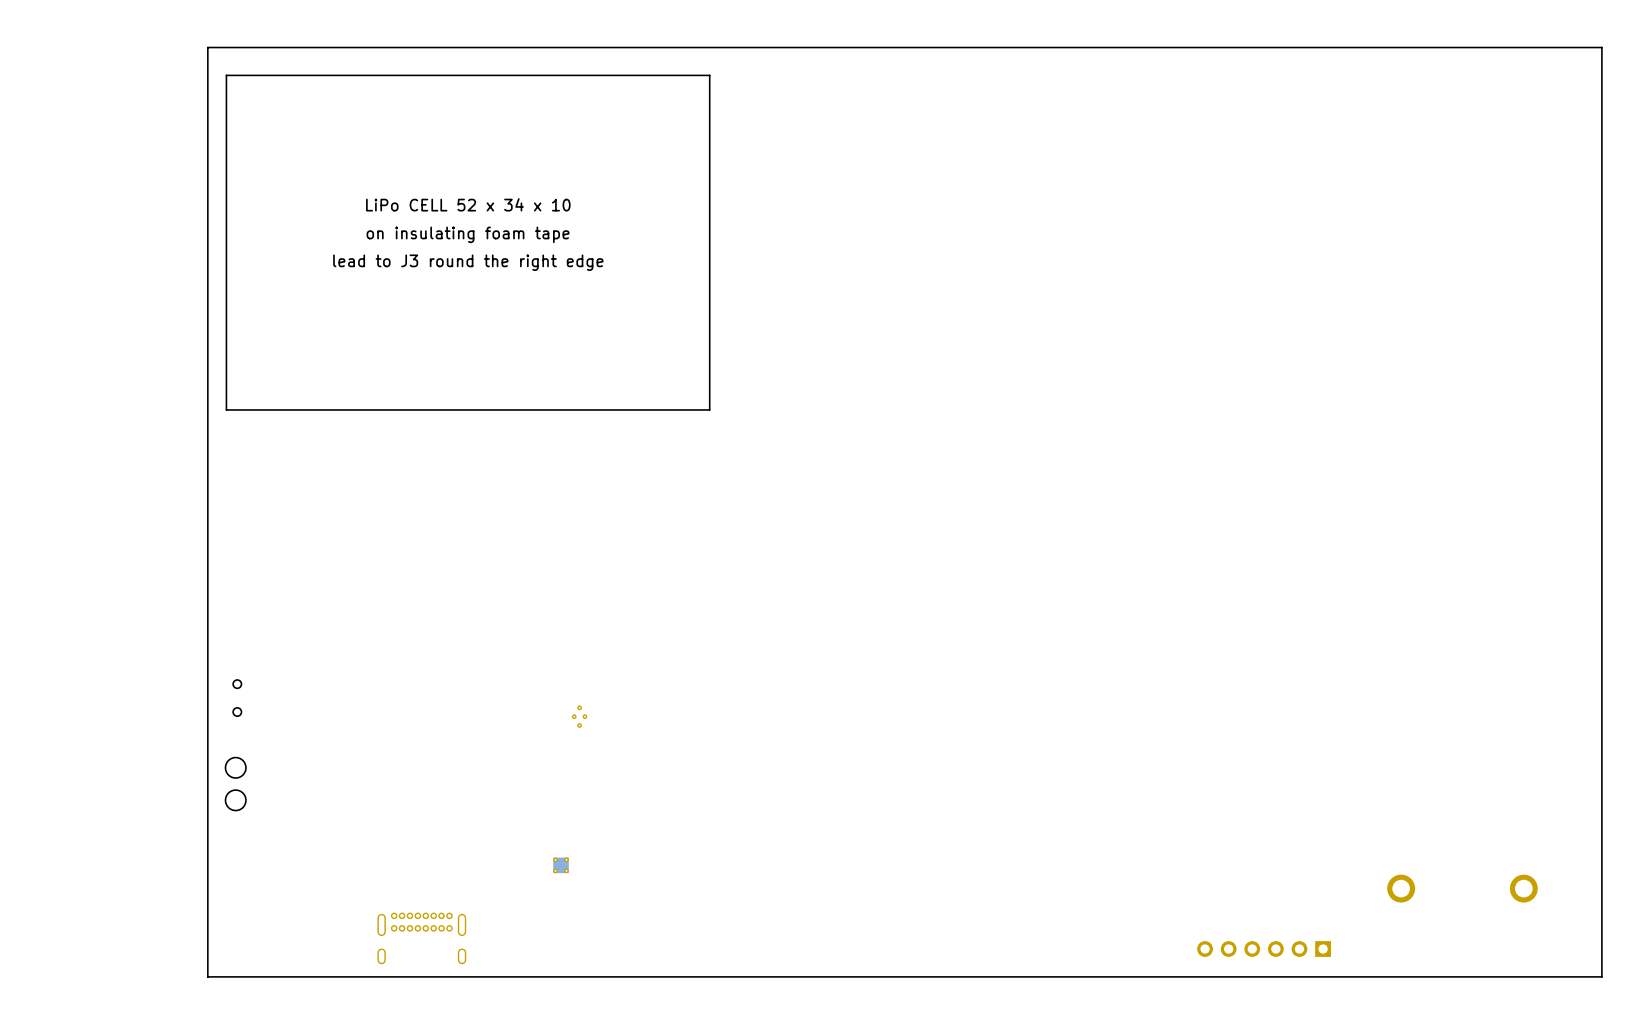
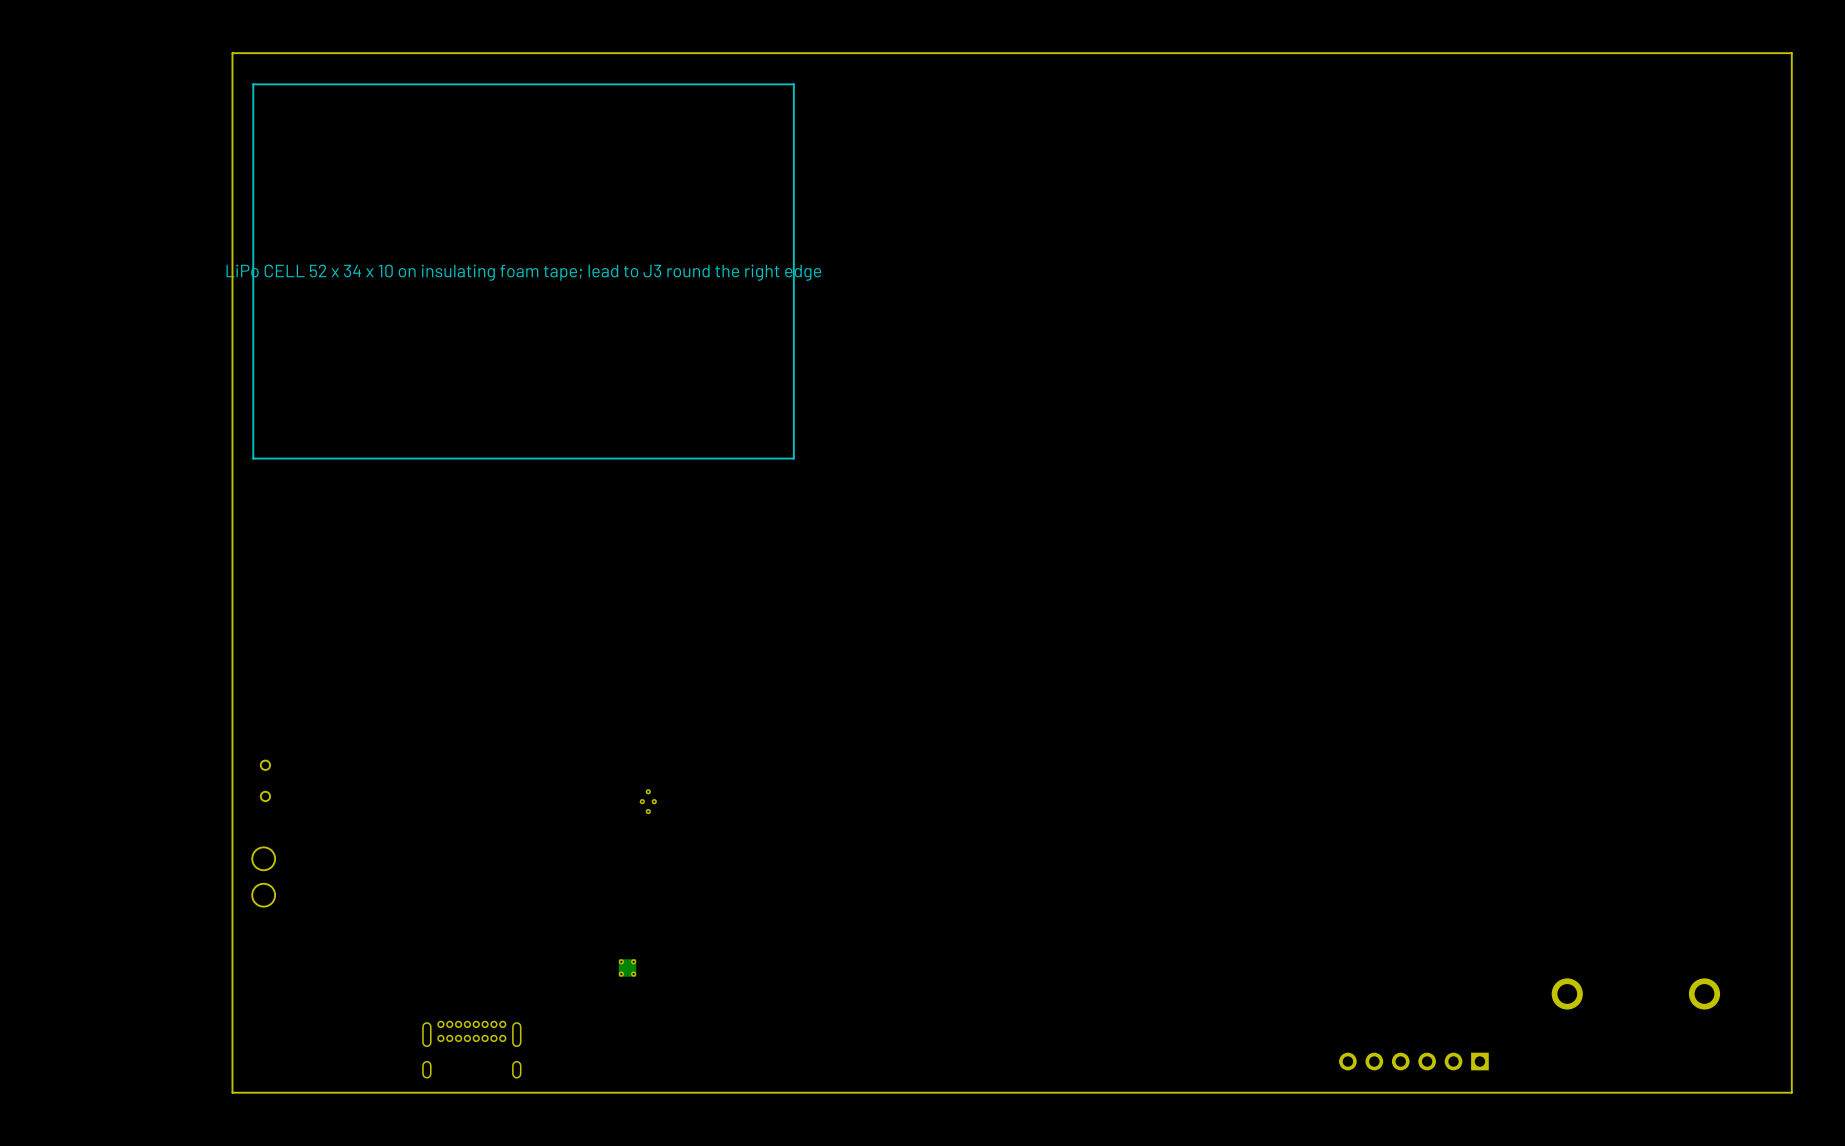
text: LiPo CELL 52 x 34 x 10 (468, 204) -> none
text: on insulating foam tape (468, 234) -> none
text: none -> LiPo CELL 52 x 34 x 10 on insulating foam tape; lead to J3 round the right edge (523, 272)
text: lead to J3 round the right edge (468, 262) -> none

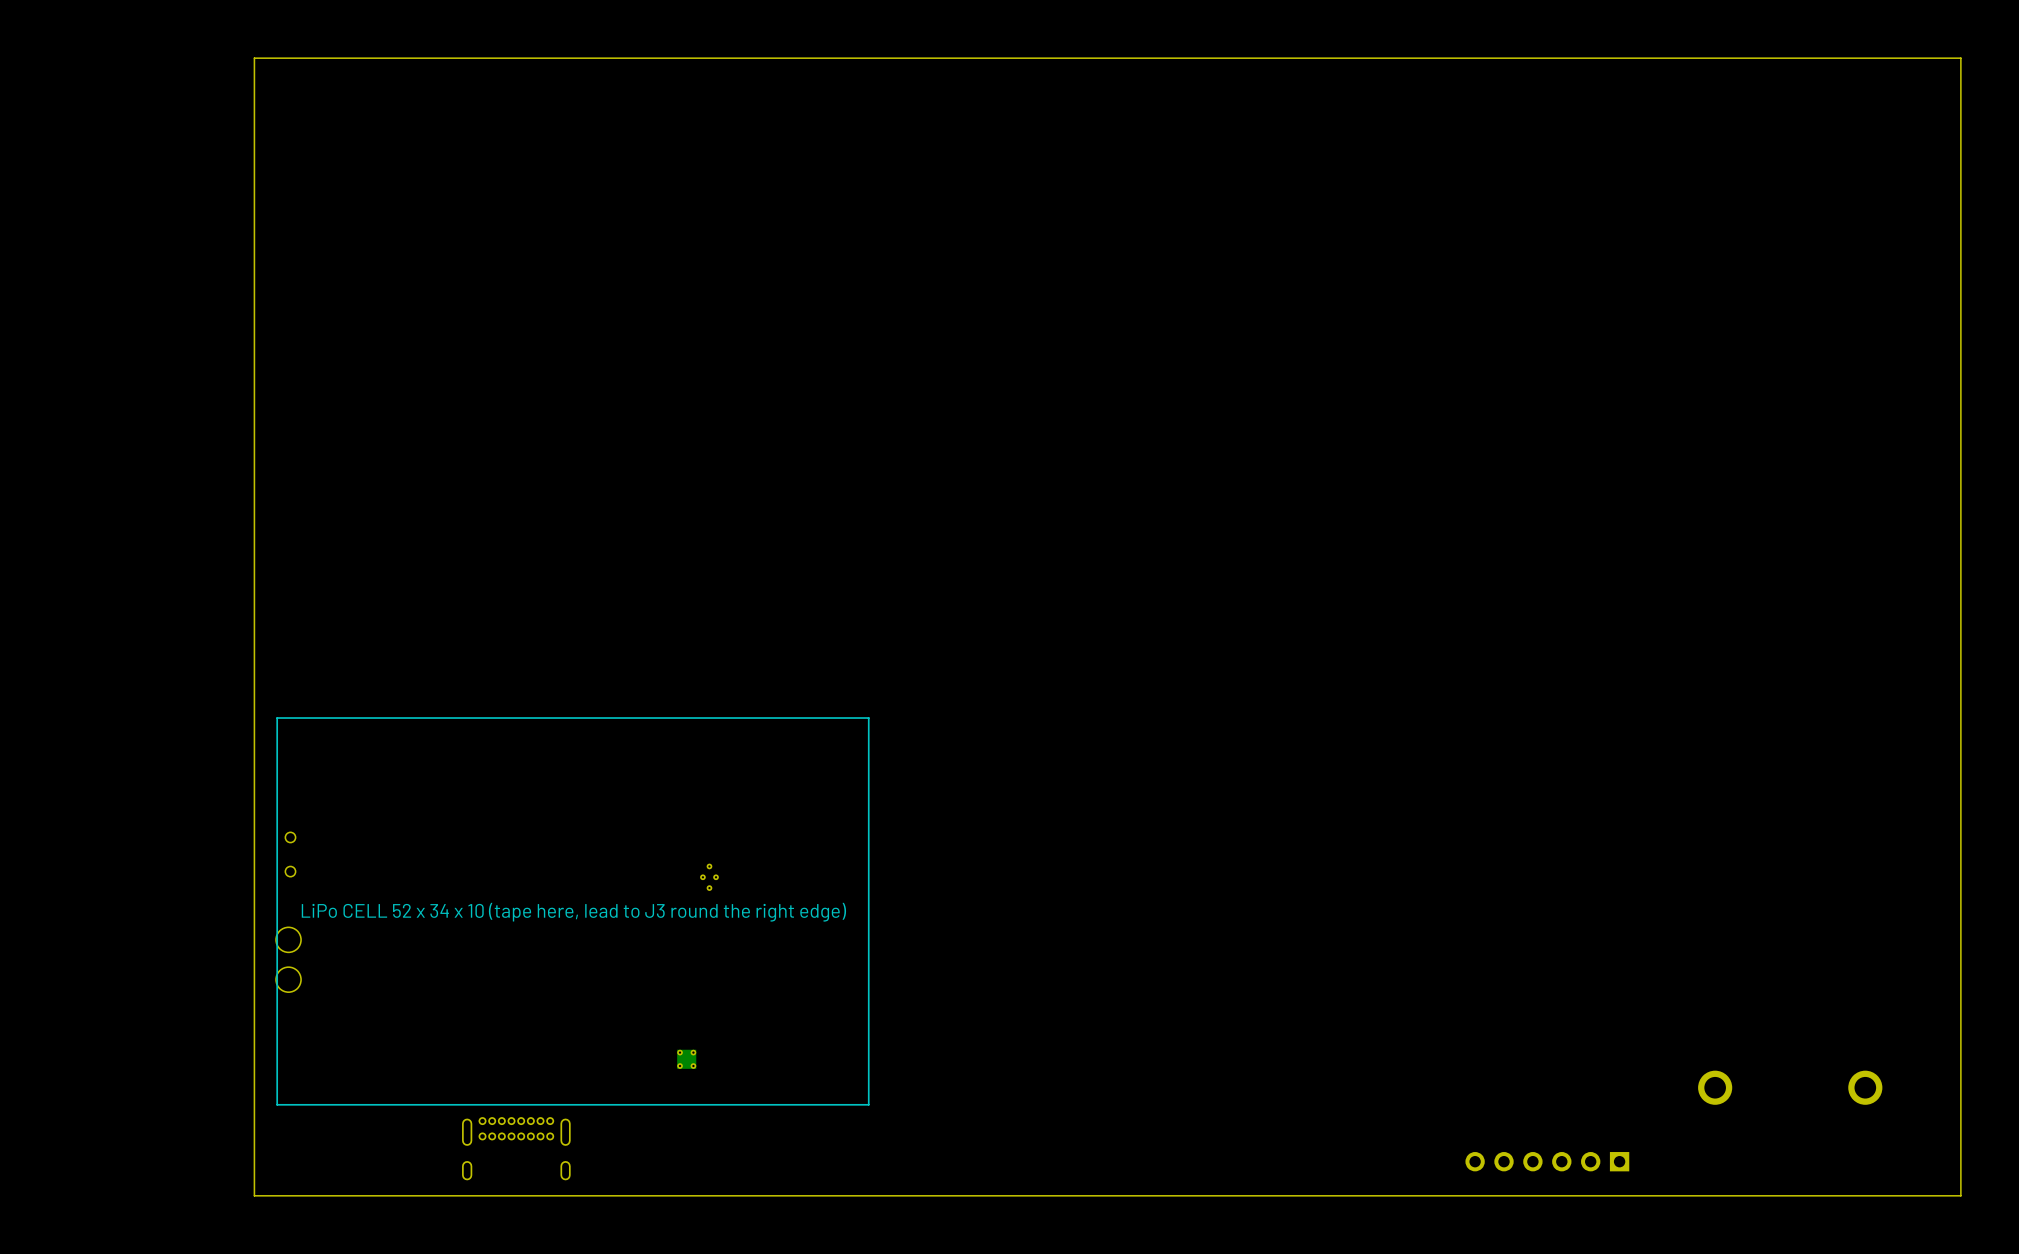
line: (793, 84) (253, 84) (253, 458) (793, 458) (793, 84) -> none
text: LiPo CELL 52 x 34 x 10 on insulating foam tape; lead to J3 round the right edge (523, 272) -> none
line: none -> (868, 718) (277, 718) (277, 1104) (868, 1104) (868, 718)
text: none -> LiPo CELL 52 x 34 x 10 (tape here, lead to J3 round the right edge) (573, 912)

